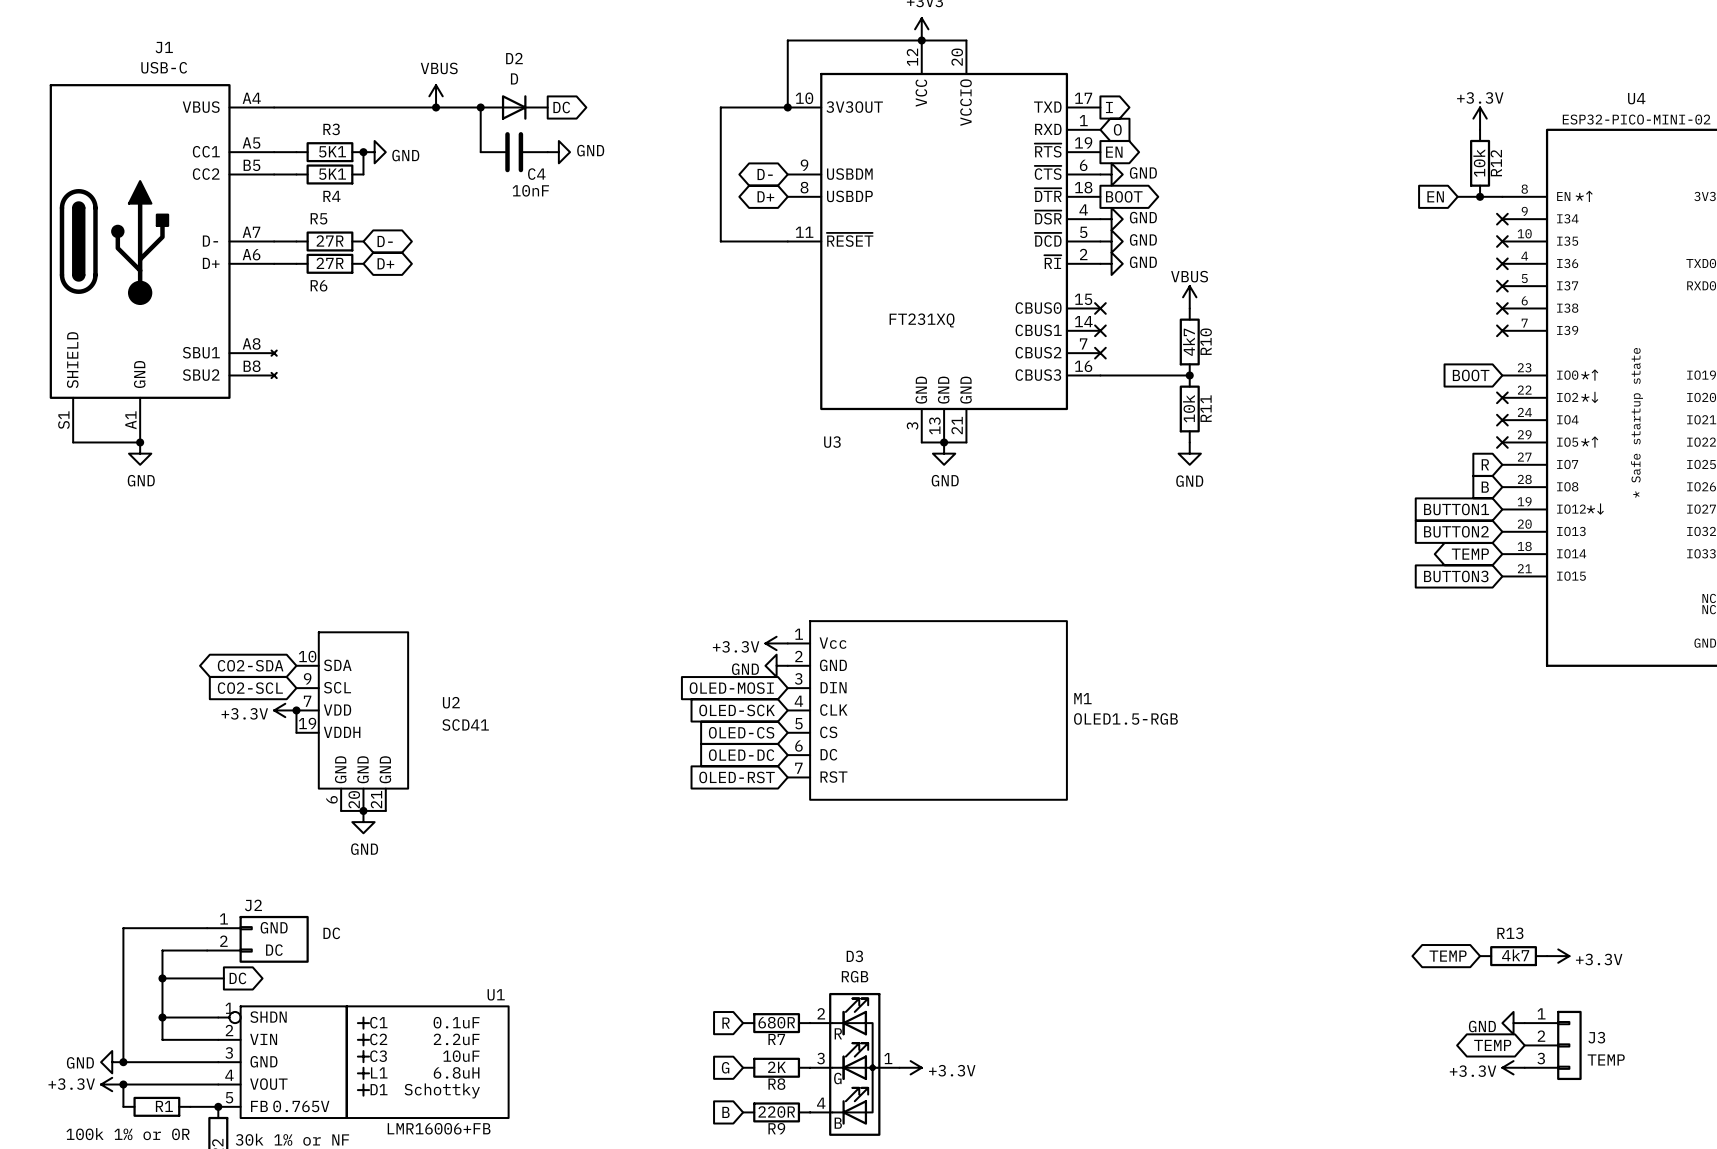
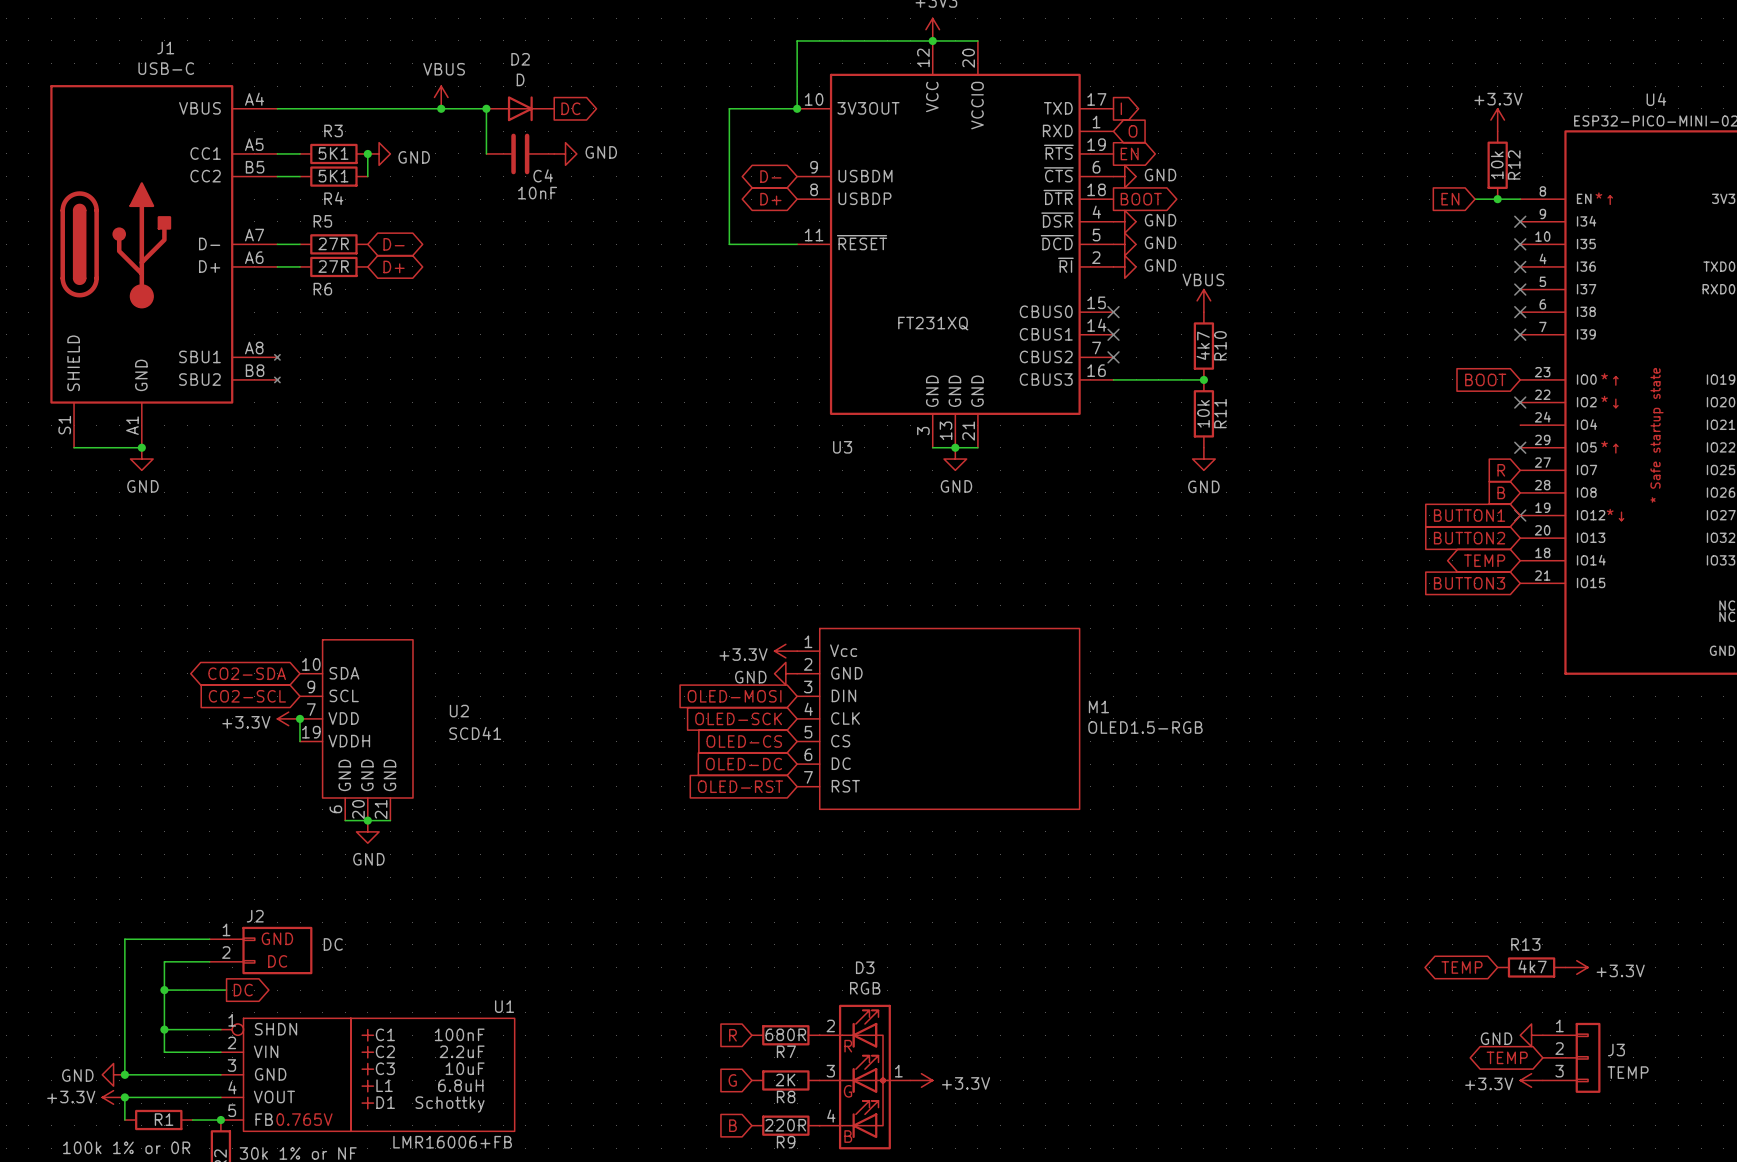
no-connect mark: (1502, 420) -> none
no-connect mark: none -> (1520, 515)
C1 value: 0.1uF (456, 1022) -> 100nF (459, 1034)

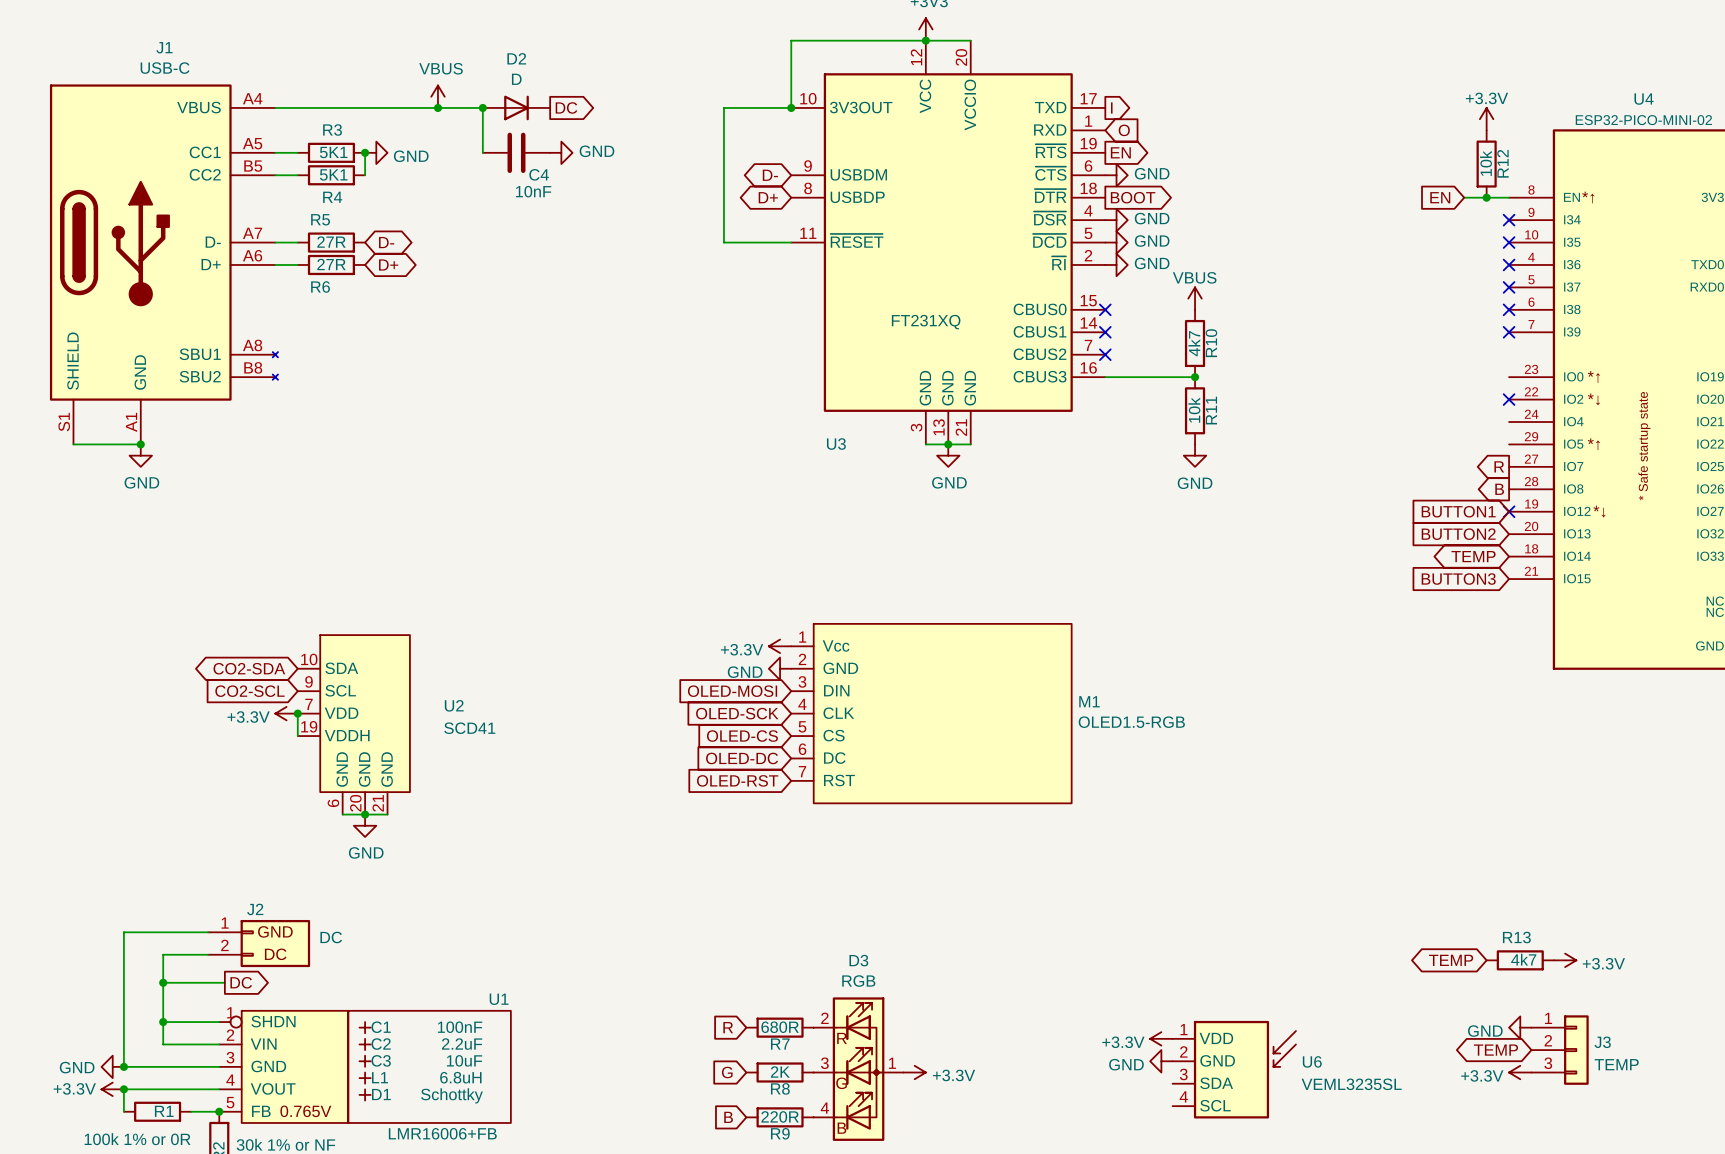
global label: BOOT (1485, 379) -> none
no-connect mark: (1520, 447) -> none
global label shape: input (1501, 470) -> output (1499, 466)
global label shape: input (1501, 492) -> output (1499, 489)
power symbol: none -> +3.3V (1161, 1038)
power symbol: none -> GND (1161, 1061)
U6: none -> VEML3235SL (1234, 1069)

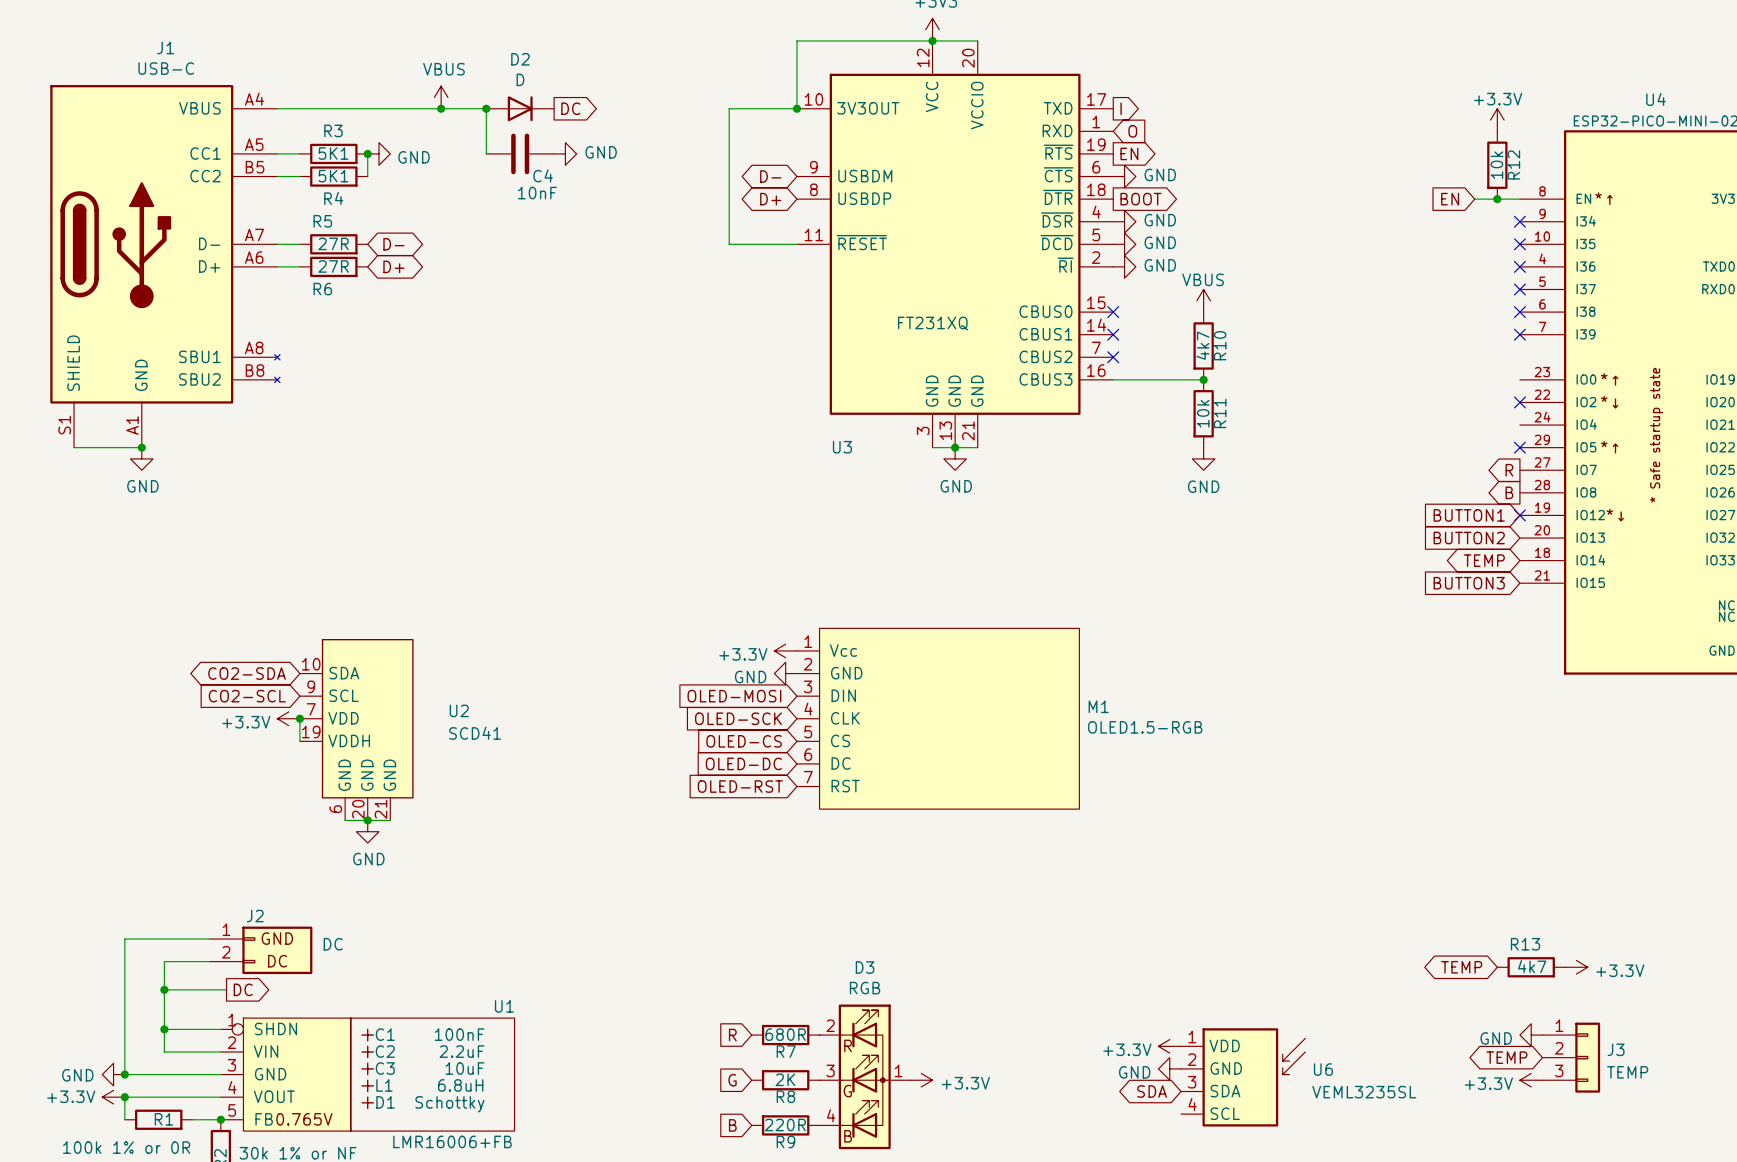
no-connect mark: none -> (1519, 447)
global label: none -> SDA (1152, 1091)

